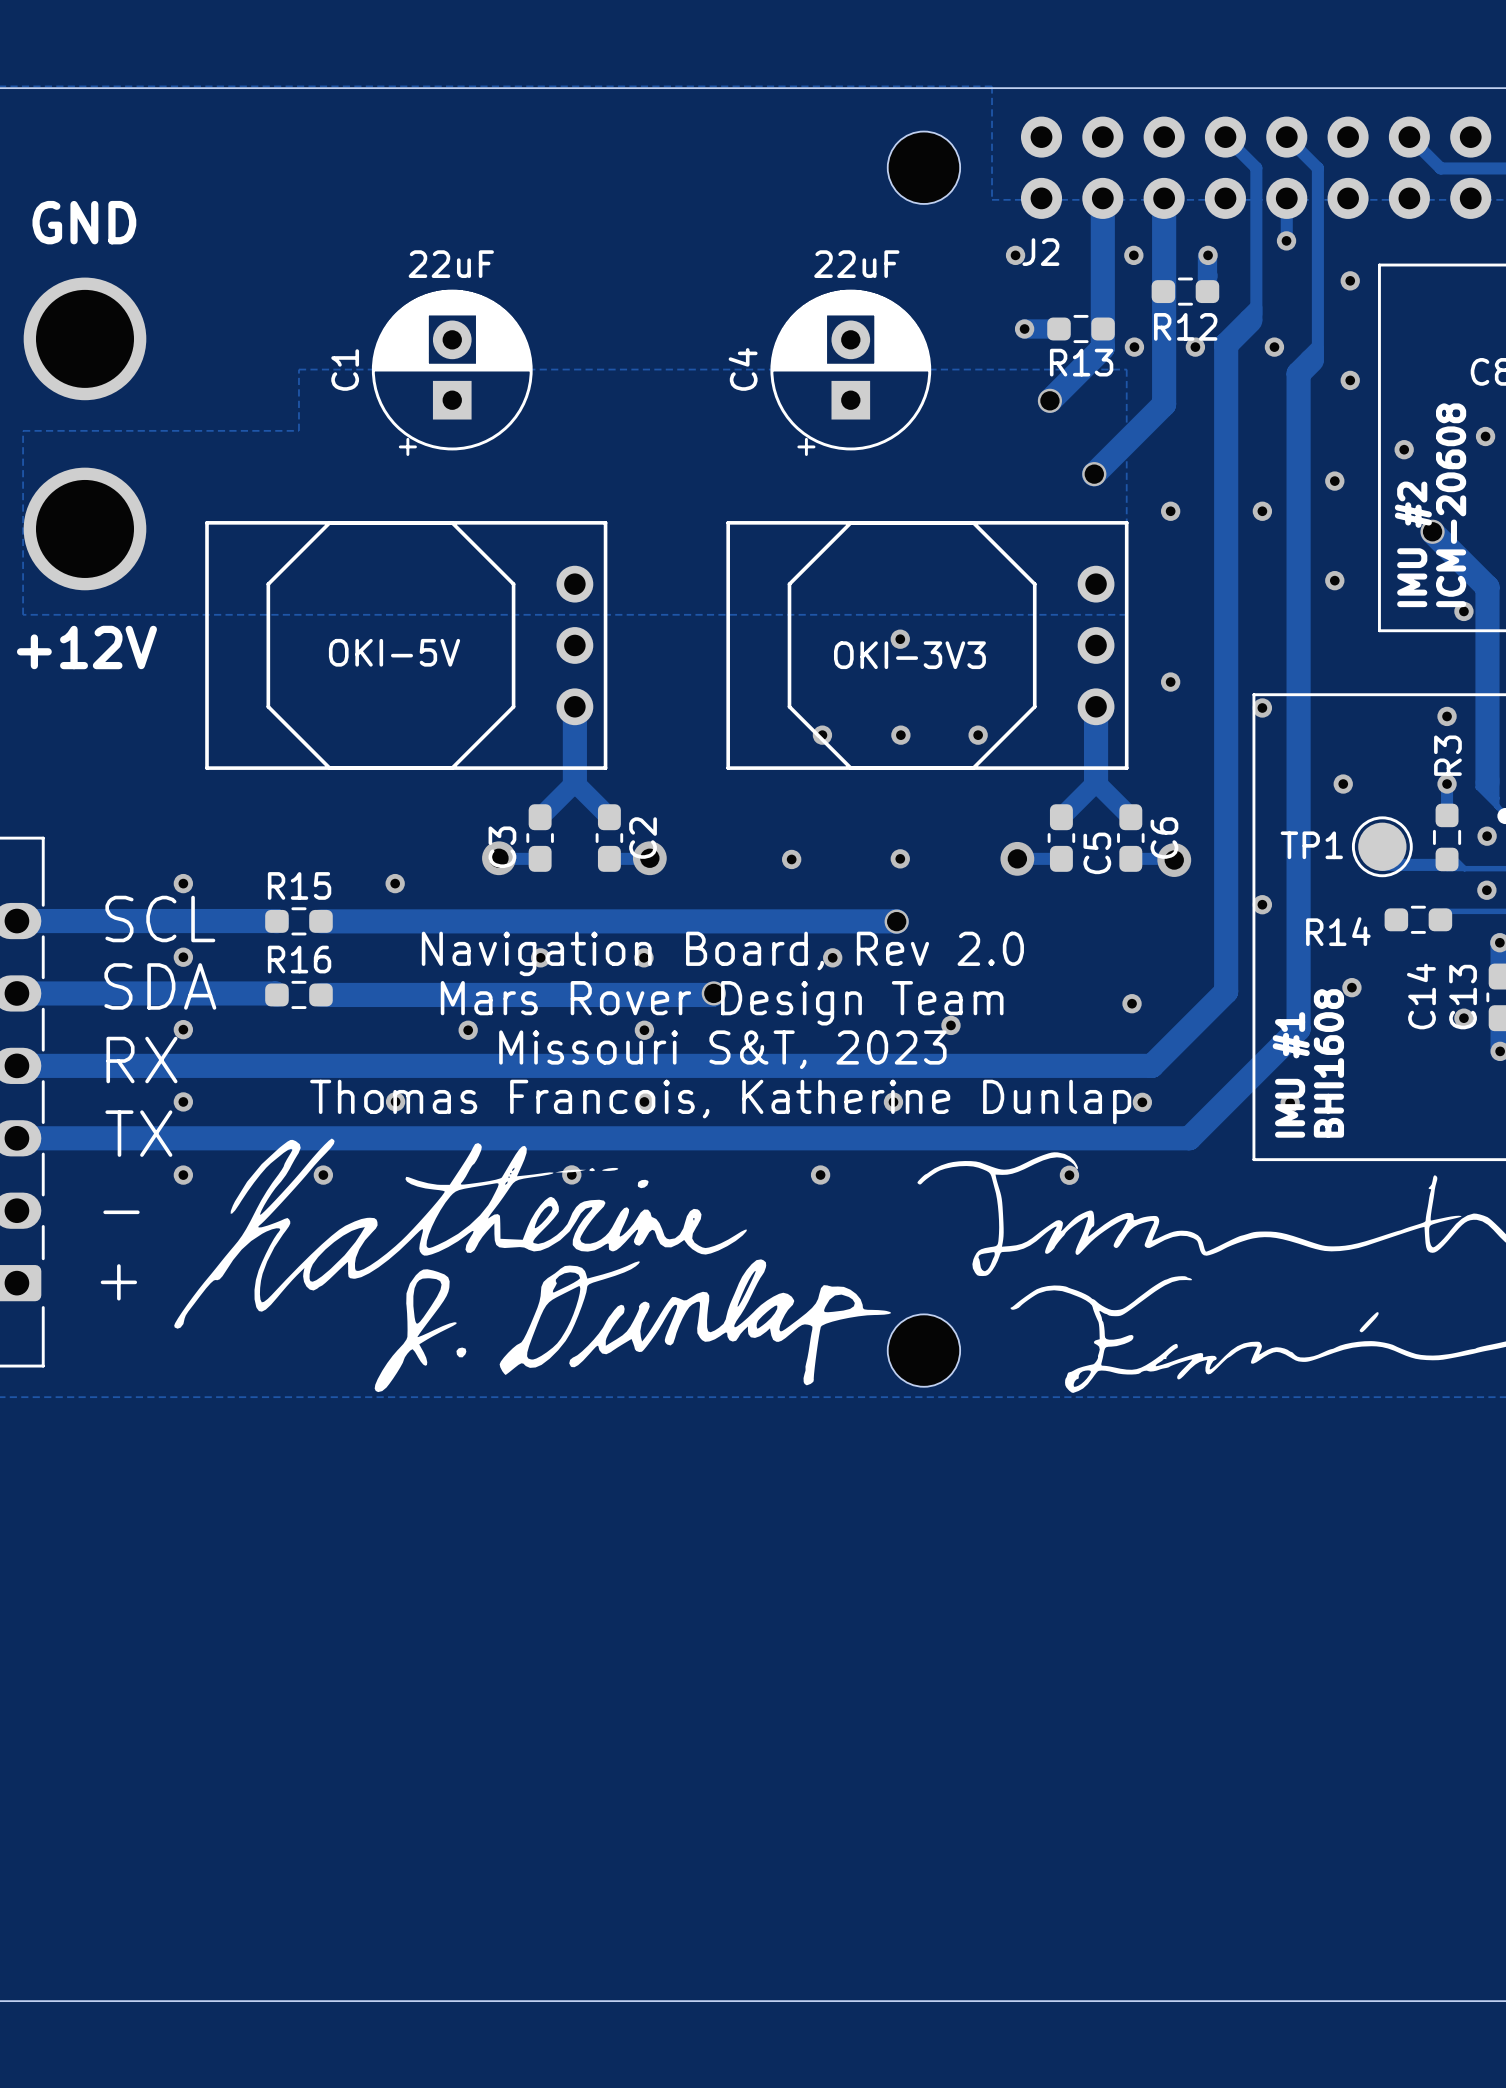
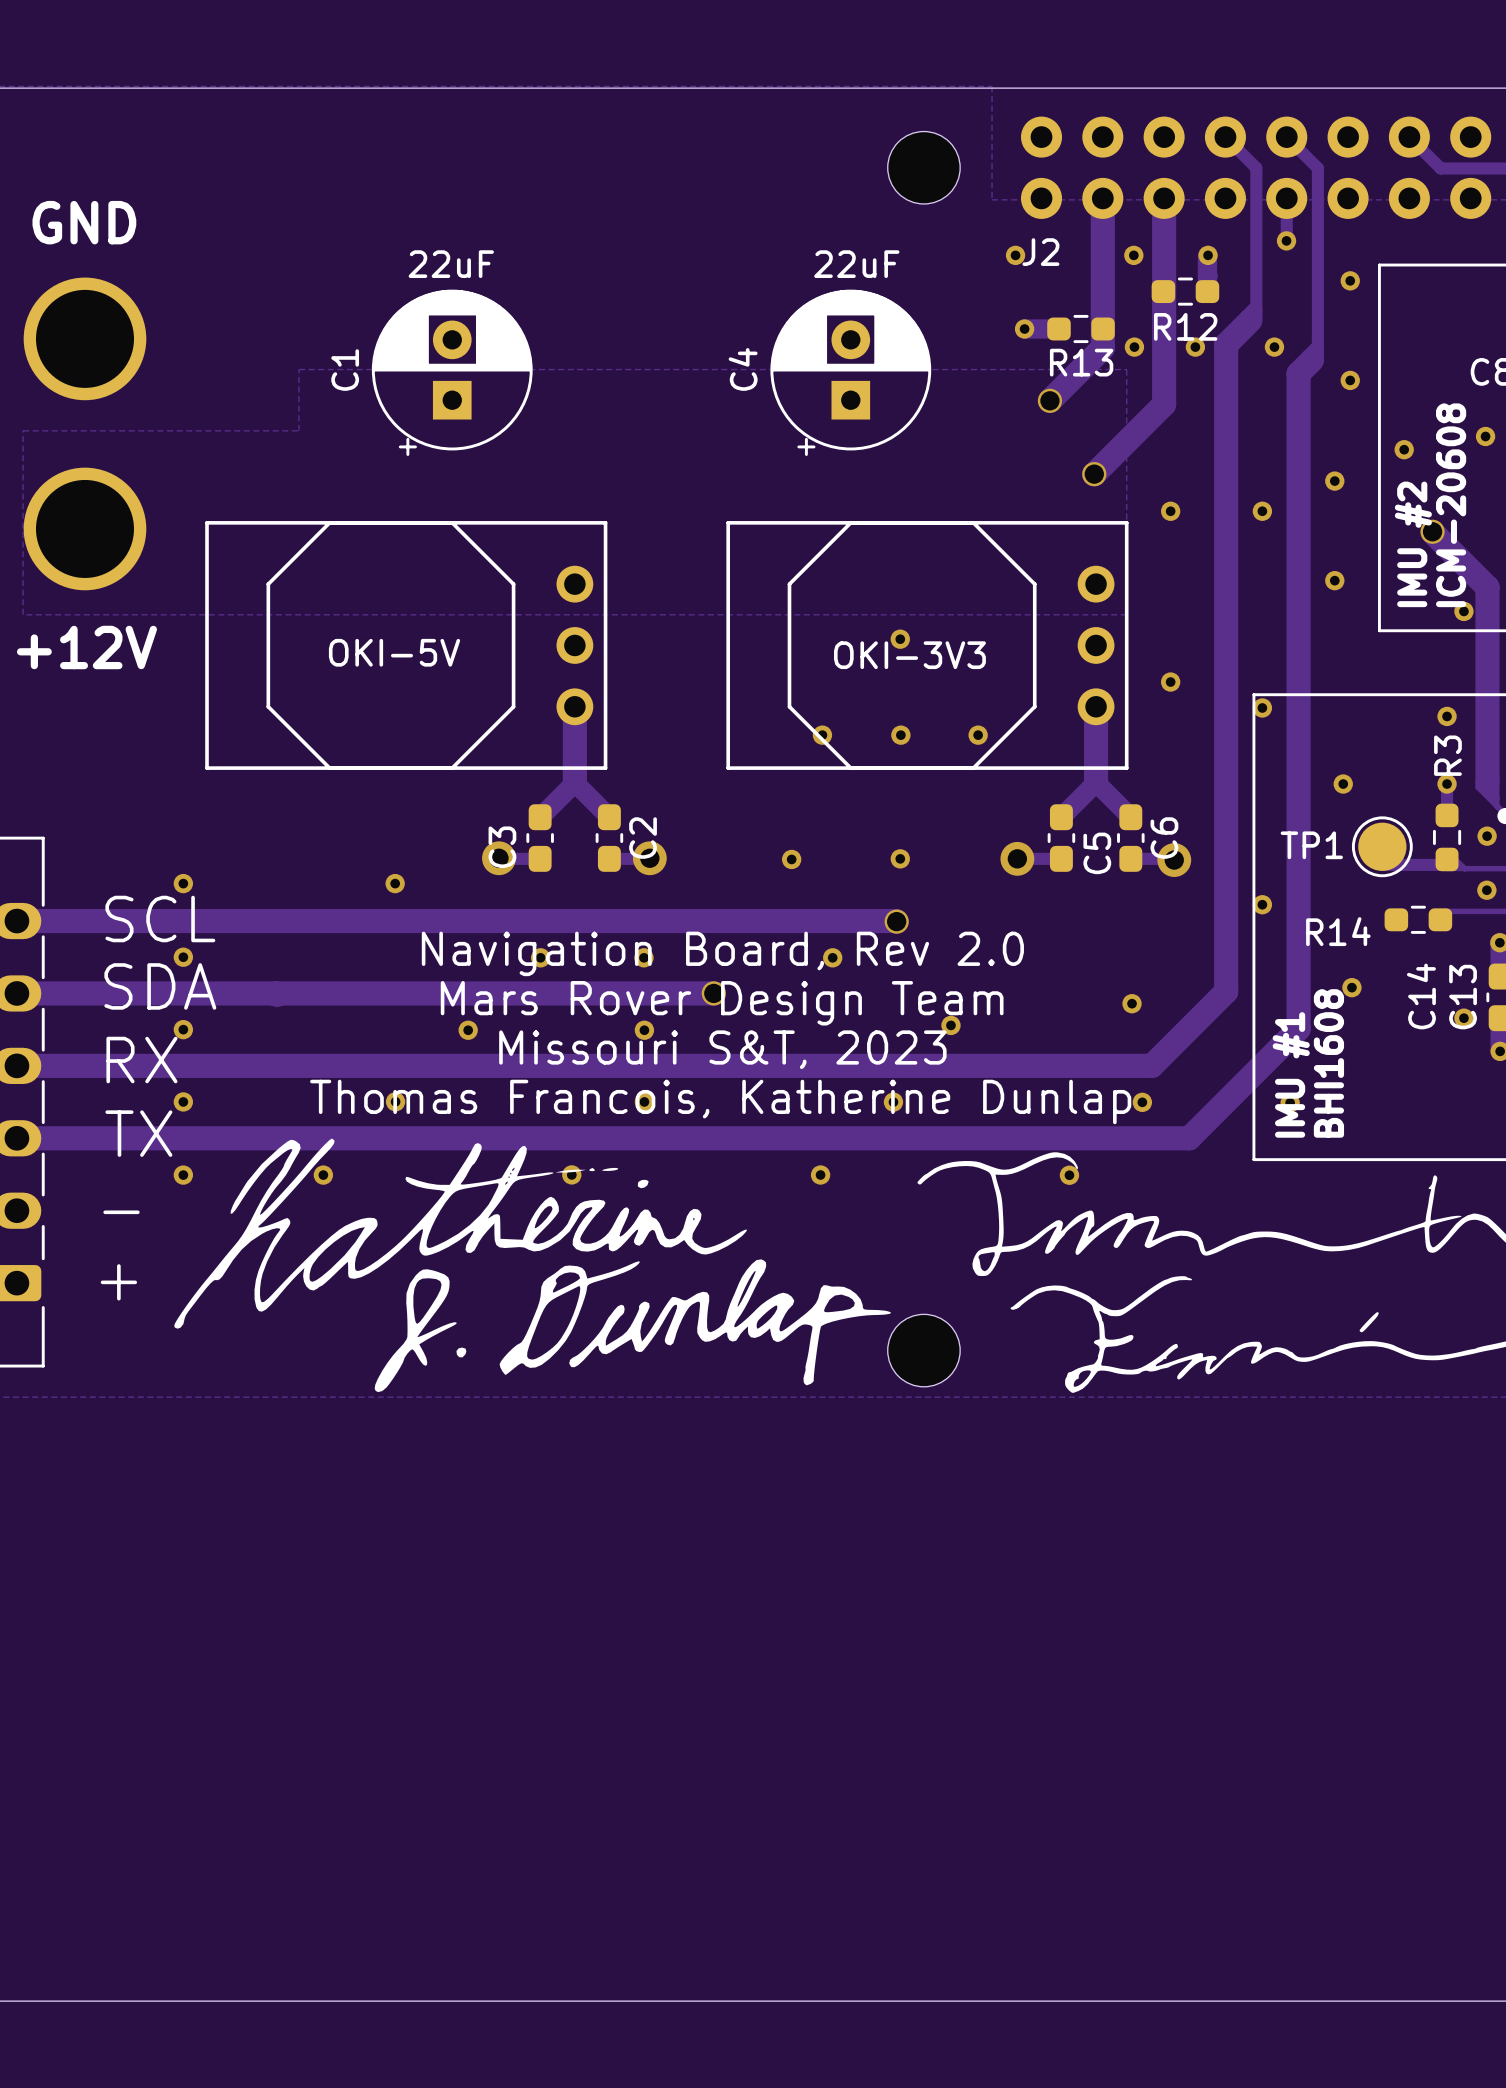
R15: (298, 921) -> none
track: (321, 921) (896, 921) -> (276, 921) (896, 921)
track: (713, 993) (321, 994) -> (713, 993) (275, 993)
R16: (298, 994) -> none

